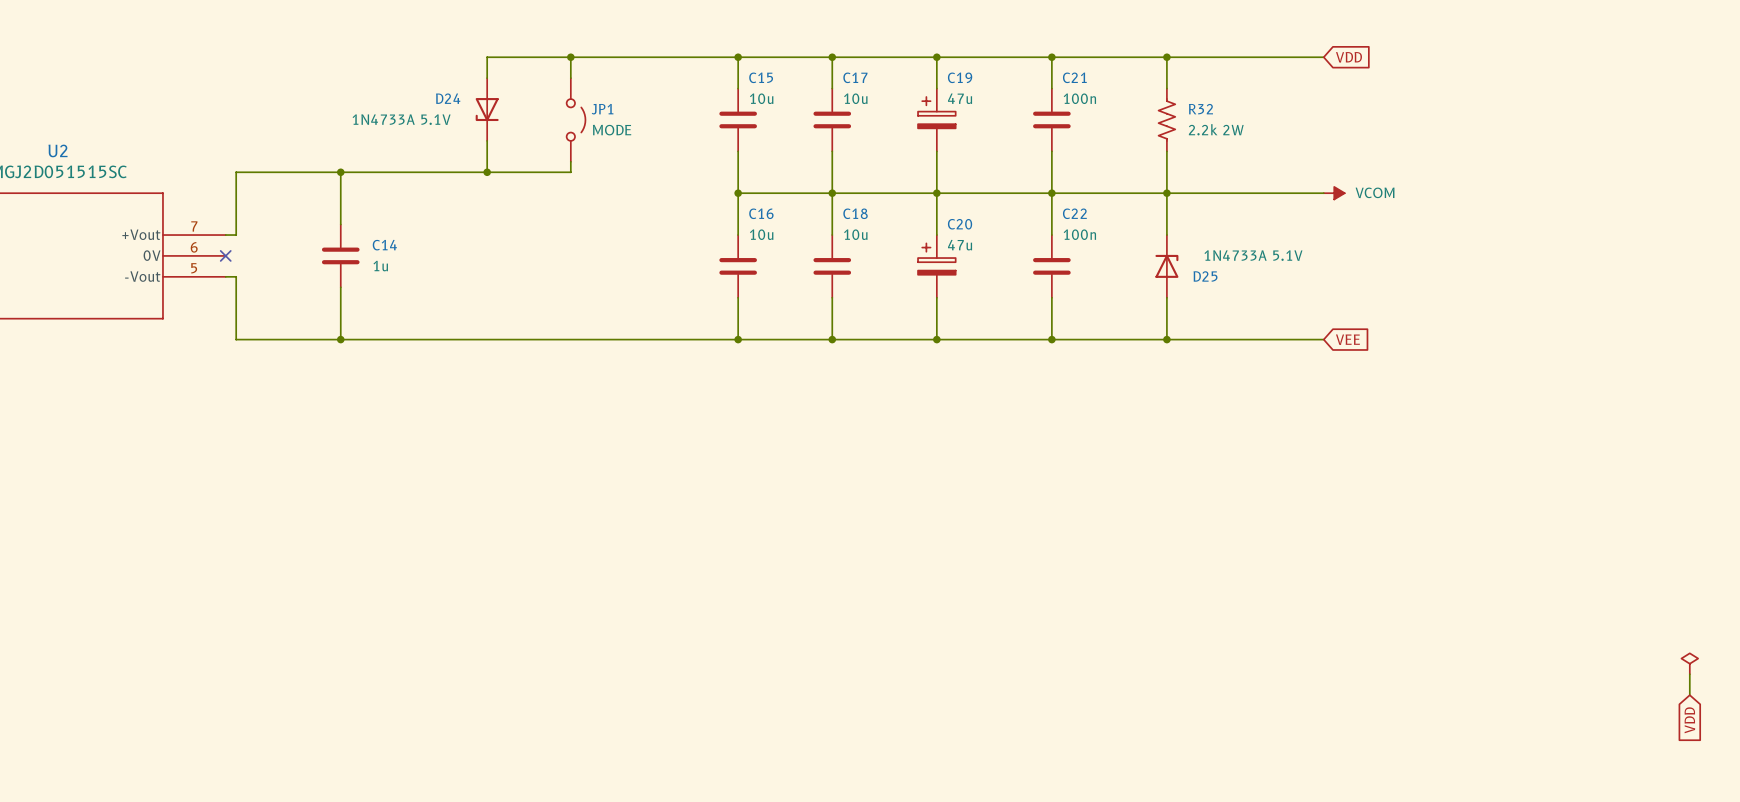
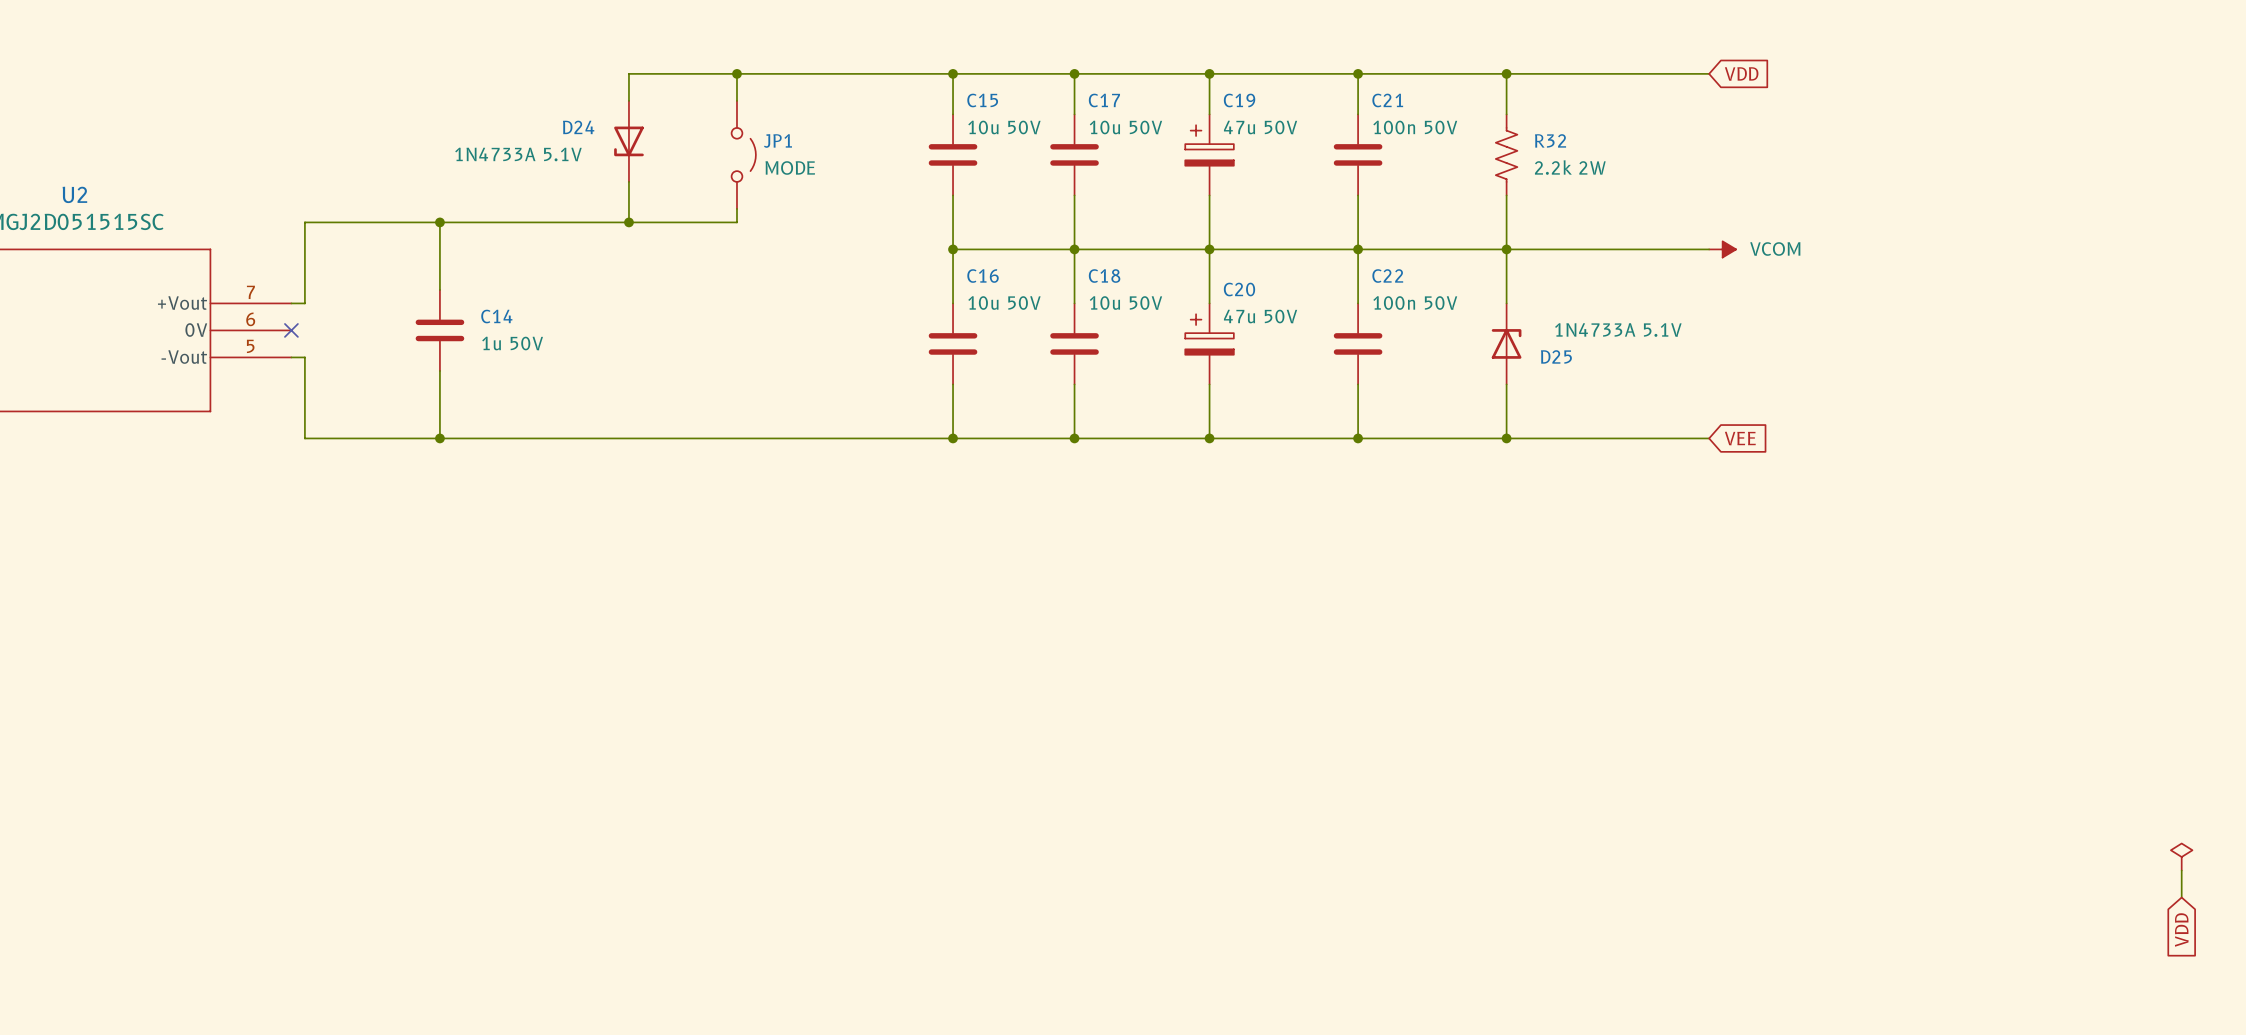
C15 value: 10u (761, 98) -> 10u 50V (1004, 127)
C17 value: 10u (855, 98) -> 10u 50V (1125, 127)
C19 value: 47u (960, 98) -> 47u 50V (1260, 127)
C21 value: 100n (1079, 98) -> 100n 50V (1415, 127)
C16 value: 10u (761, 234) -> 10u 50V (1004, 303)
C18 value: 10u (855, 234) -> 10u 50V (1125, 303)
C22 value: 100n (1079, 234) -> 100n 50V (1415, 303)
C20 value: 47u (960, 245) -> 47u 50V (1260, 316)
C14 value: 1u (380, 266) -> 1u 50V (512, 343)

